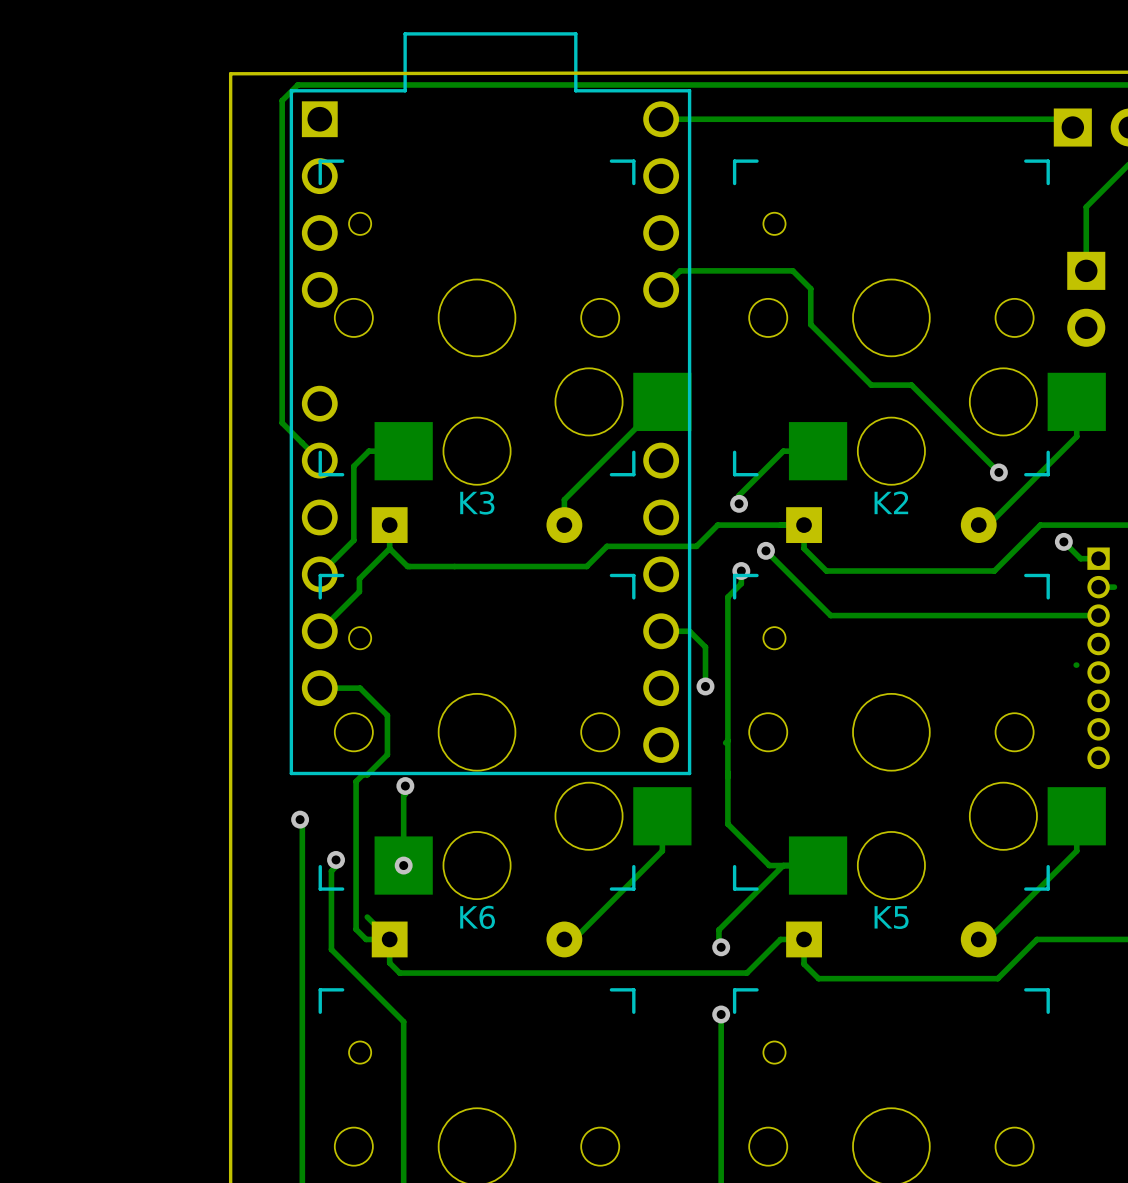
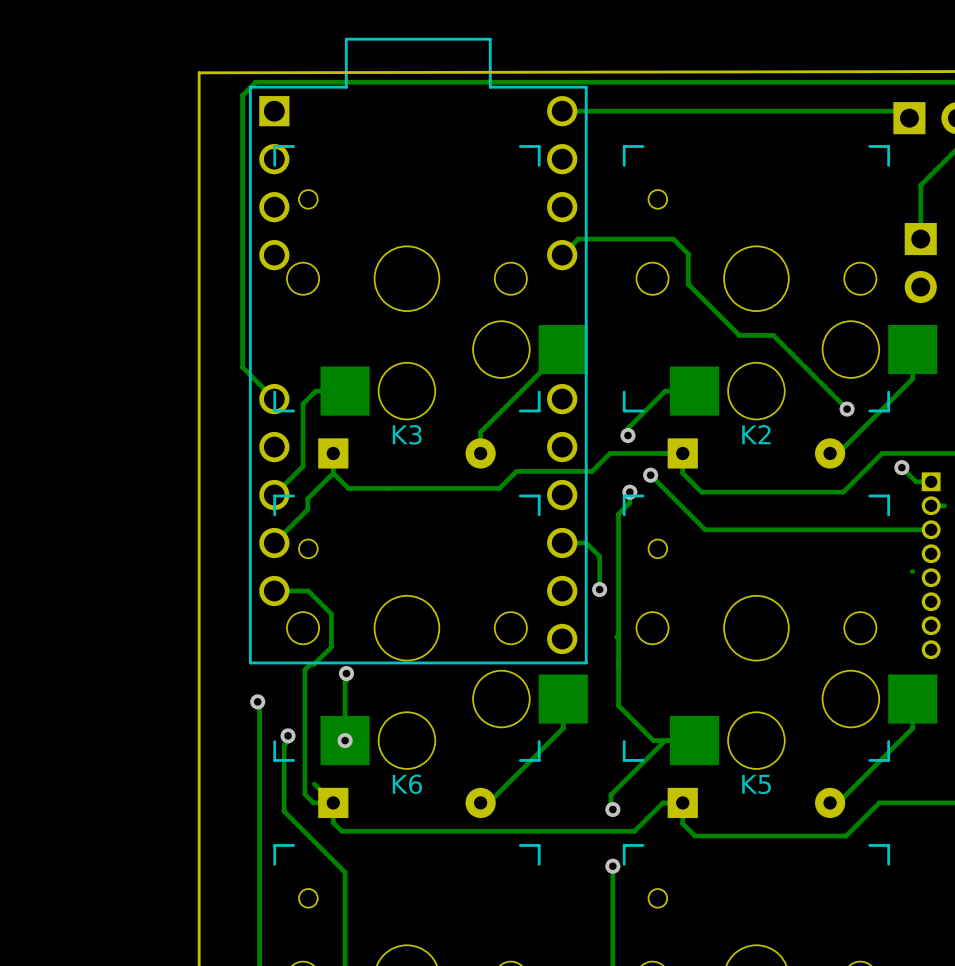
part footprint: [289, 32, 692, 776] -> [248, 37, 588, 665]

